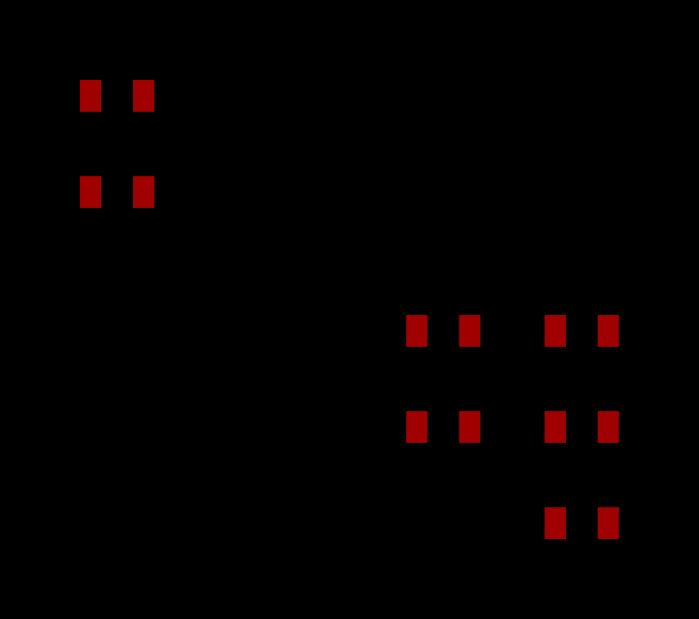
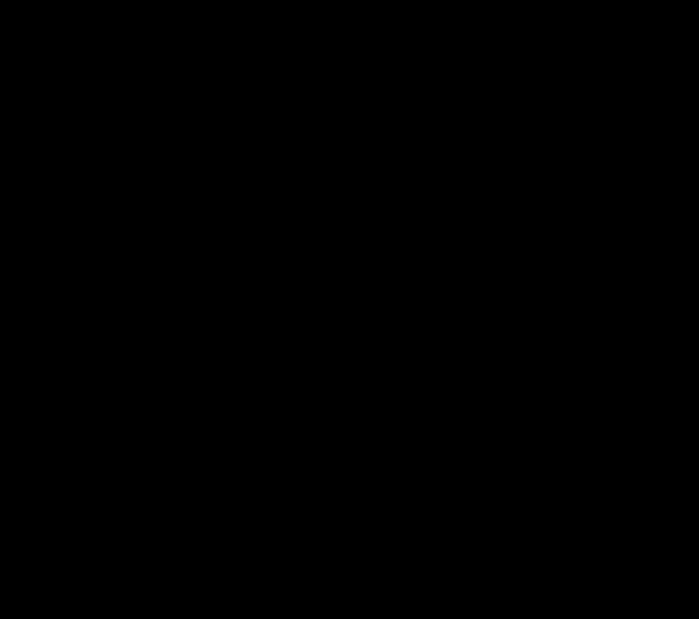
part: (117, 95) -> none
part: (117, 192) -> none
part: (443, 330) -> none
part: (581, 330) -> none
part: (443, 427) -> none
part: (581, 427) -> none
part: (581, 523) -> none

